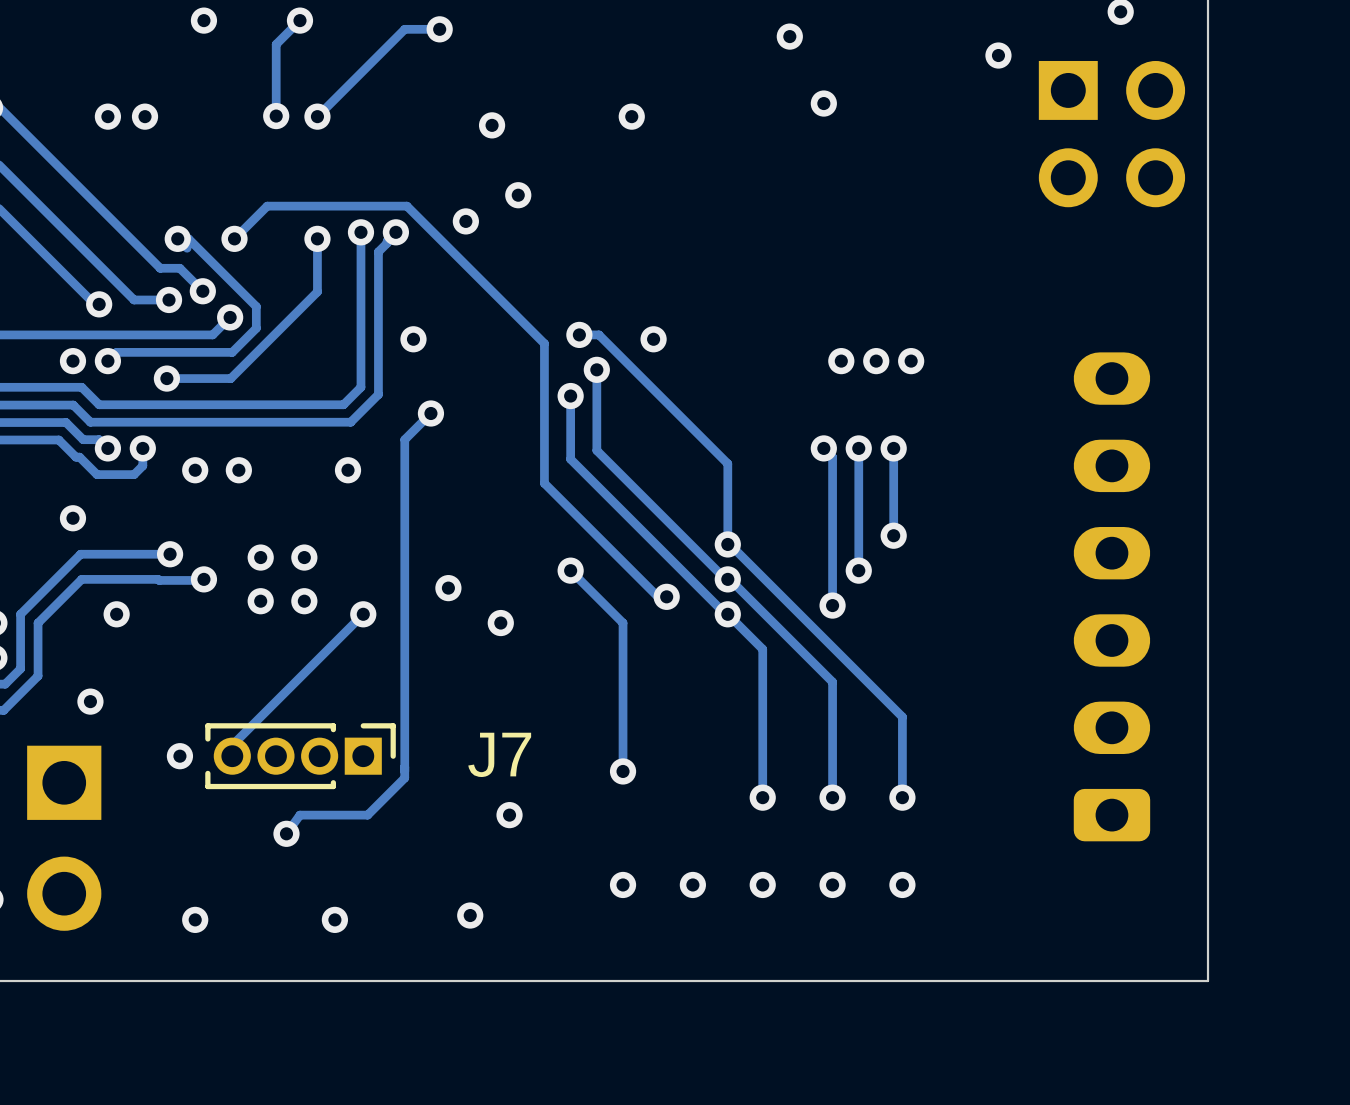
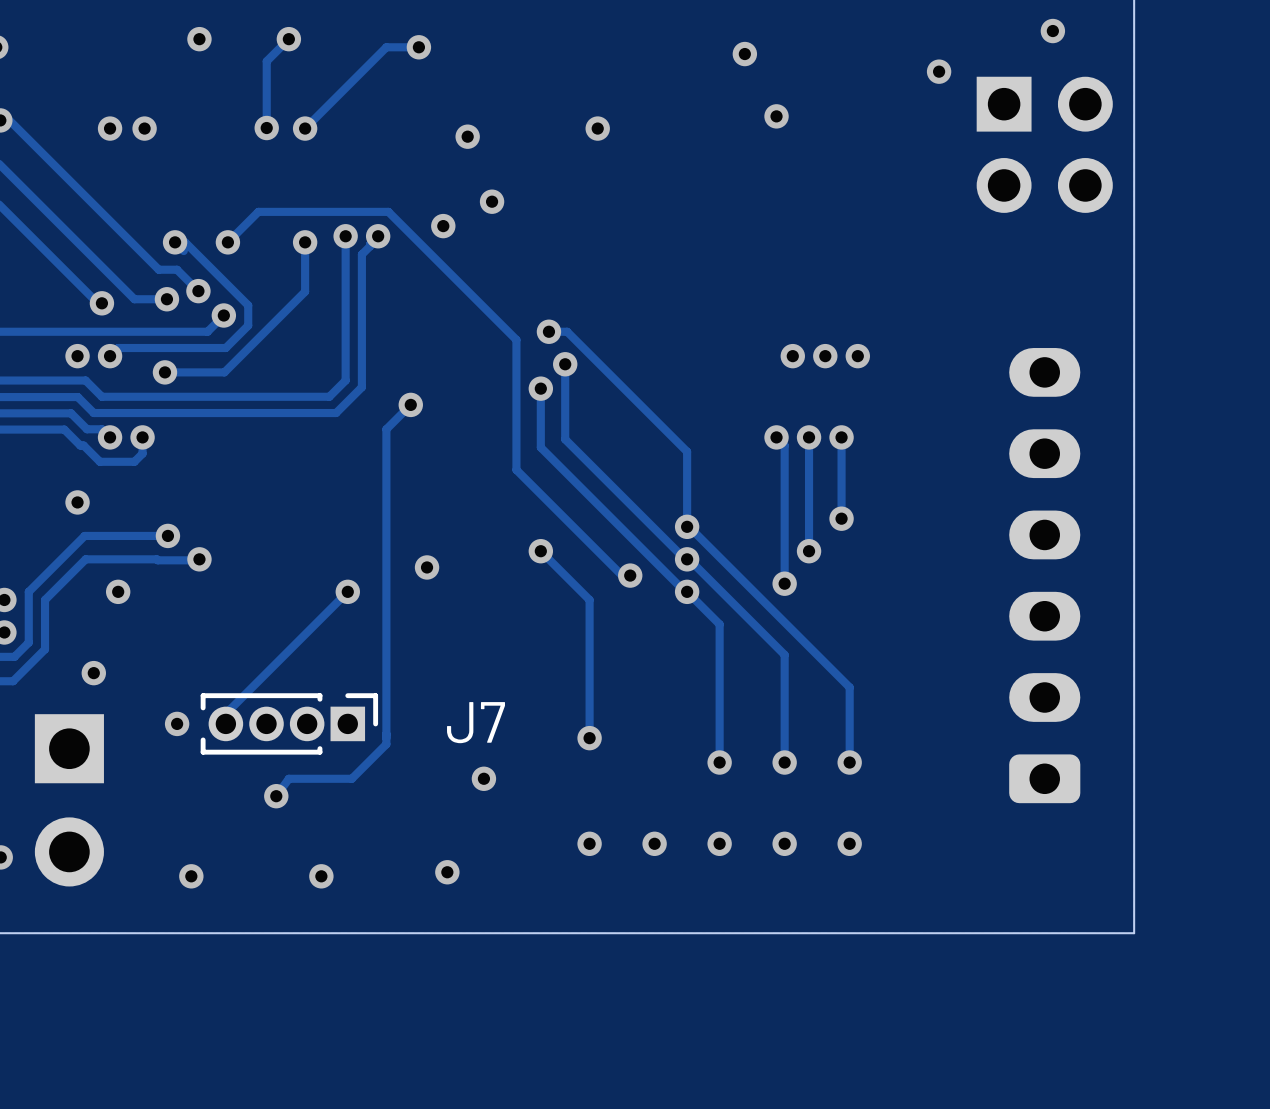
via: (413, 339) -> none
via: (653, 339) -> none
via: (195, 470) -> none
via: (238, 470) -> none
via: (348, 470) -> none
via: (260, 557) -> none
via: (304, 557) -> none
via: (260, 601) -> none
via: (304, 601) -> none
via: (500, 623) -> none

